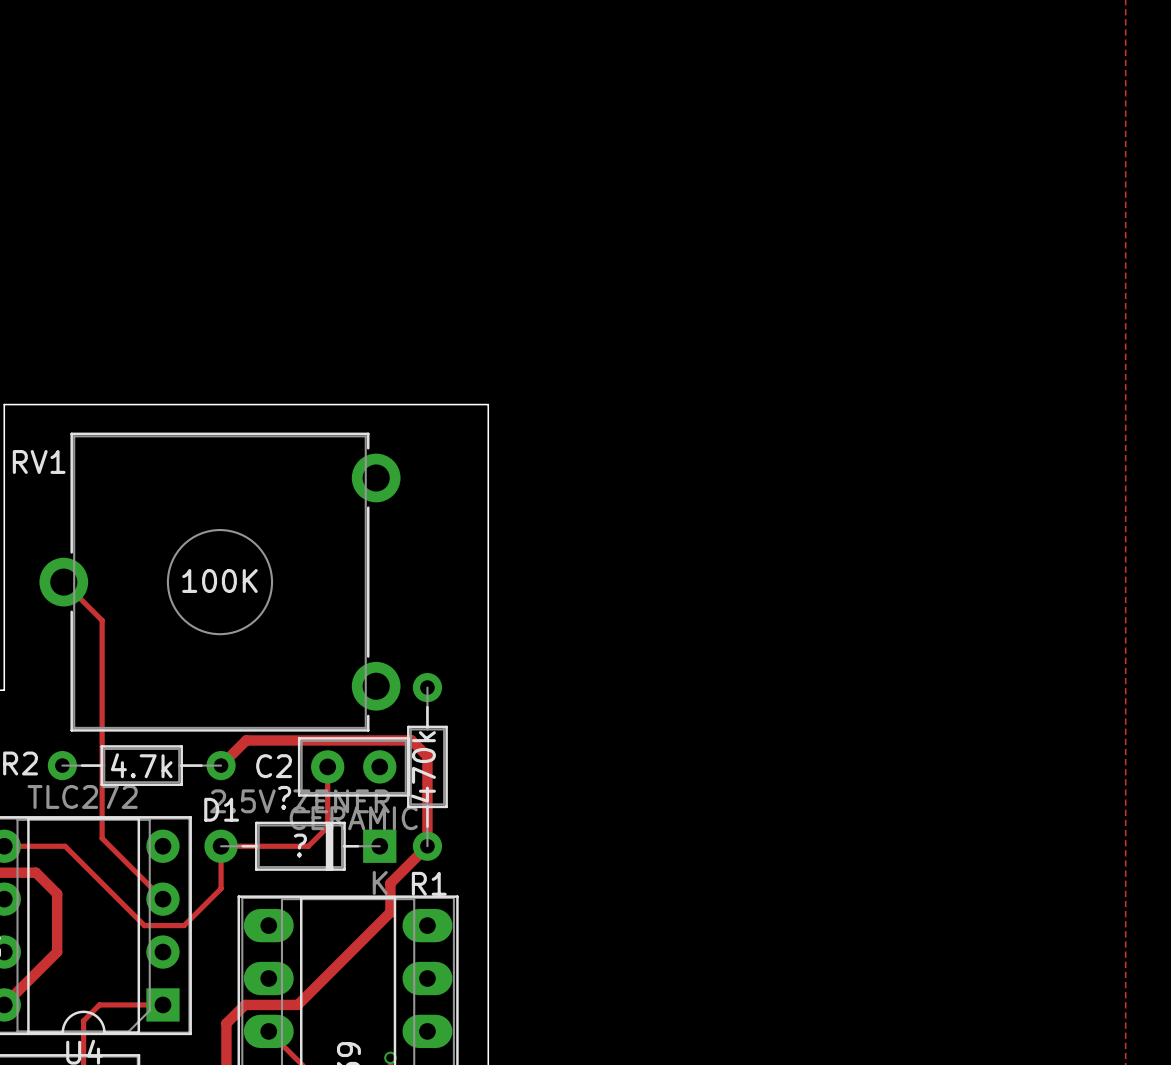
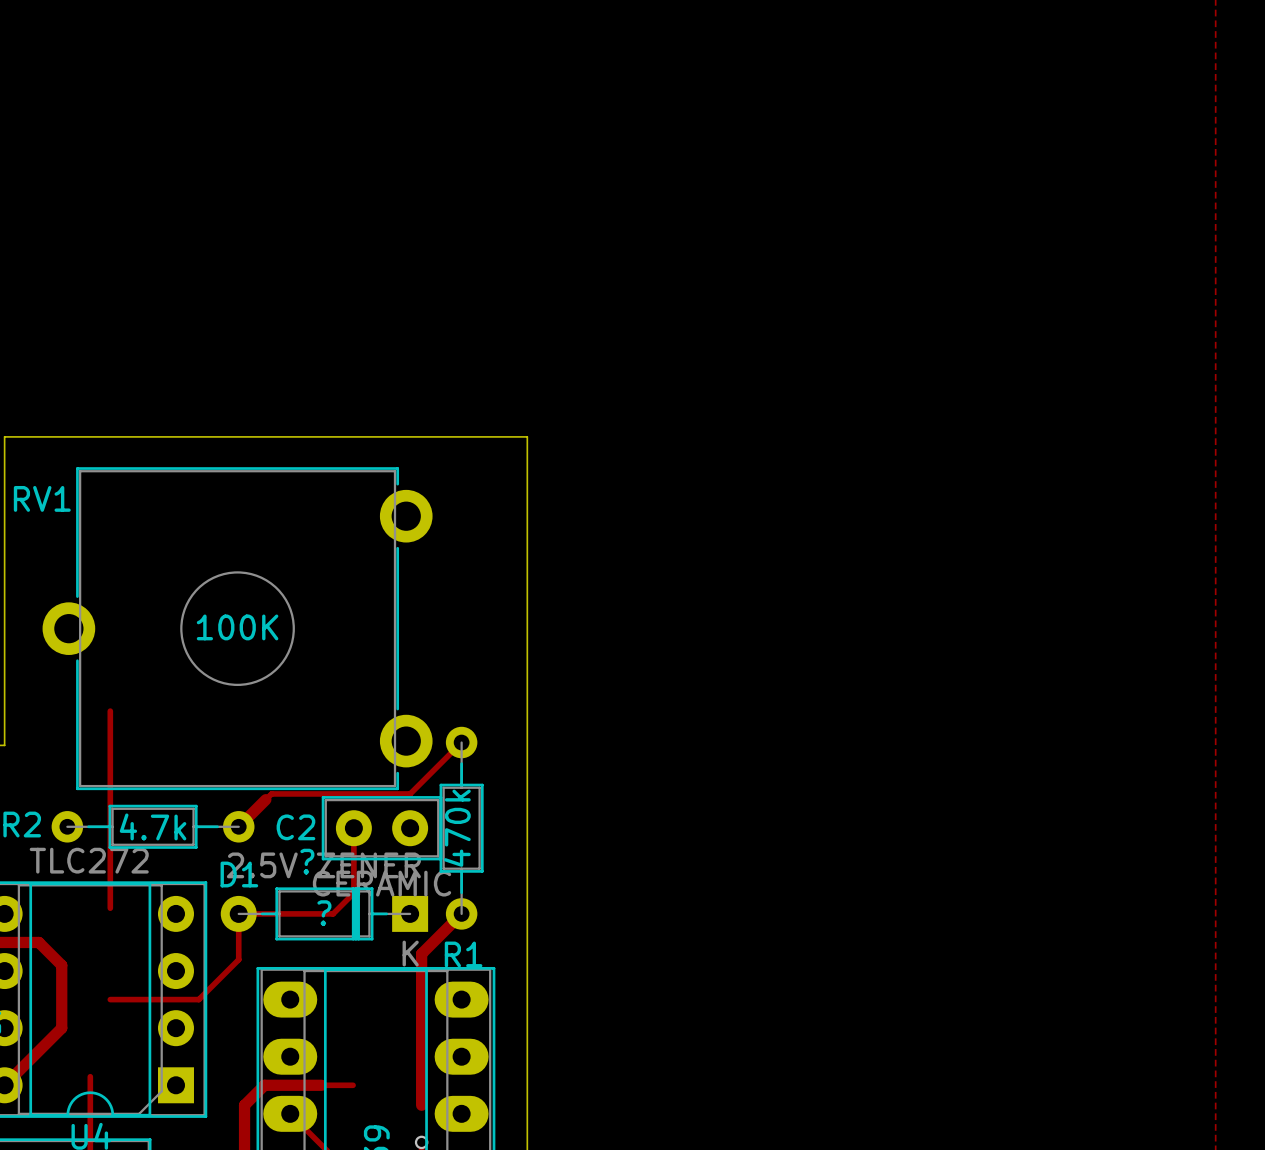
track: (63, 582) (102, 620) (102, 658) -> none
track: (246, 740) (411, 740) (427, 756) (427, 846) -> (265, 799) (271, 793) (410, 793) (461, 742)
track: (102, 838) (162, 899) -> (110, 905) (110, 908)
track: (4, 846) (65, 846) (144, 925) -> (110, 999) (156, 999)
track: (390, 912) (297, 1004) -> (421, 985) (421, 1105)
track: (162, 1004) (99, 1004) (83, 1020) -> (90, 1076) (90, 1102)
track: none -> (321, 1085) (353, 1085)

